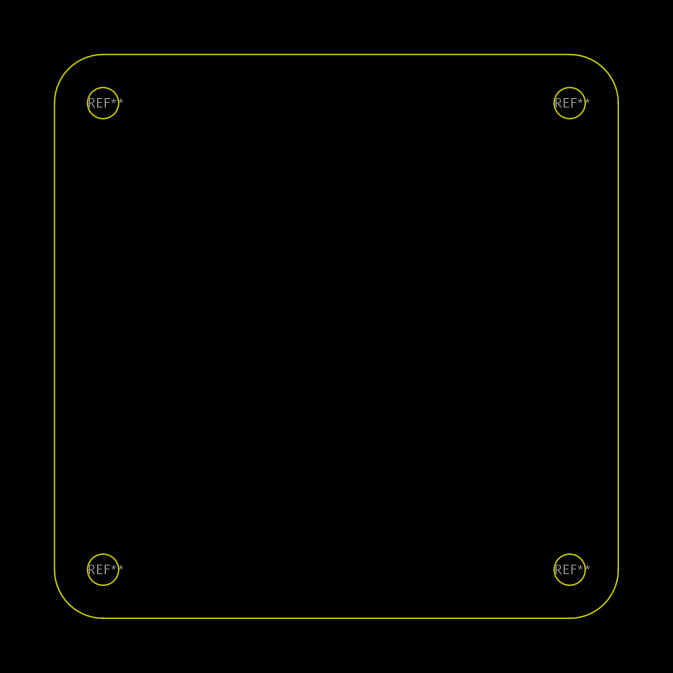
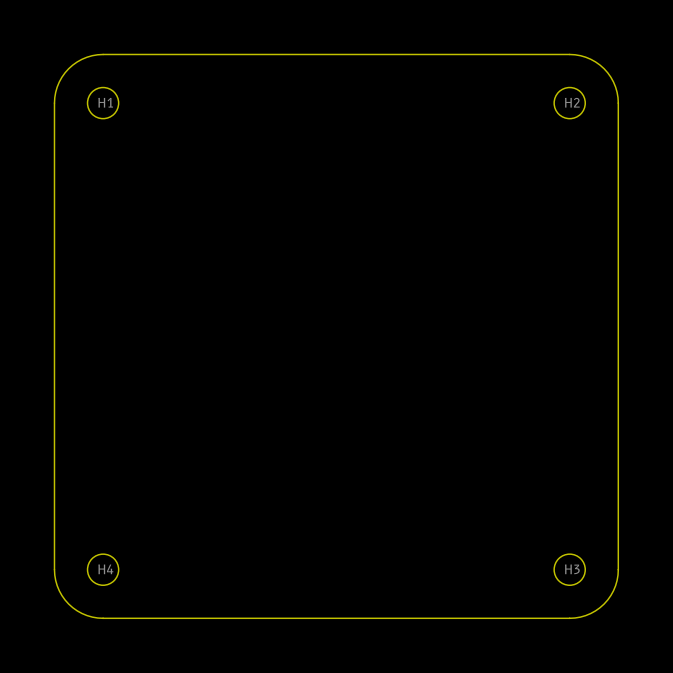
REF** name: REF** (105, 102) -> H1 (105, 102)
REF** name: REF** (572, 102) -> H2 (572, 102)
REF** name: REF** (105, 569) -> H4 (105, 569)
REF** name: REF** (572, 569) -> H3 (572, 569)

